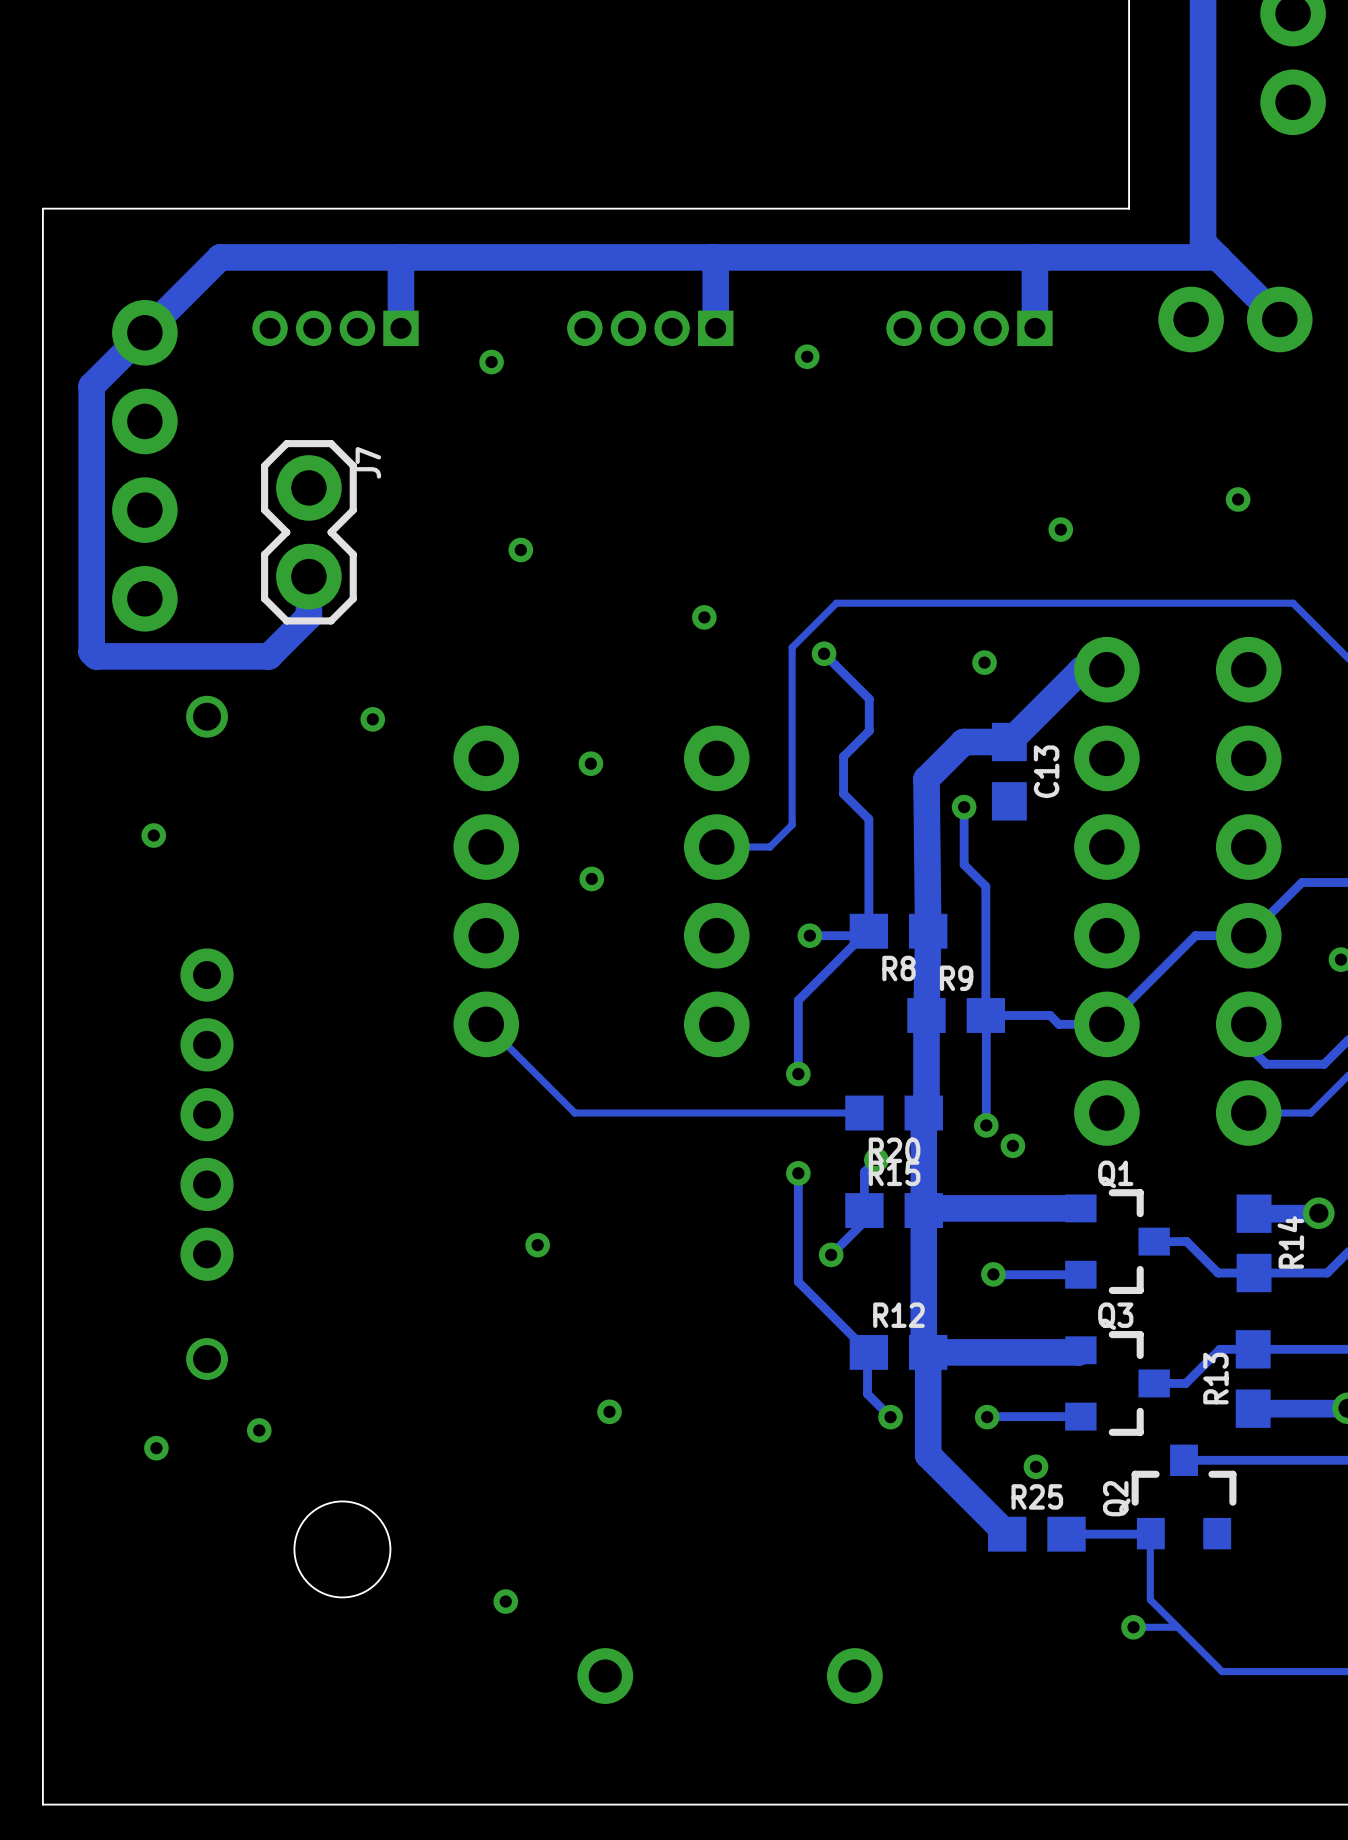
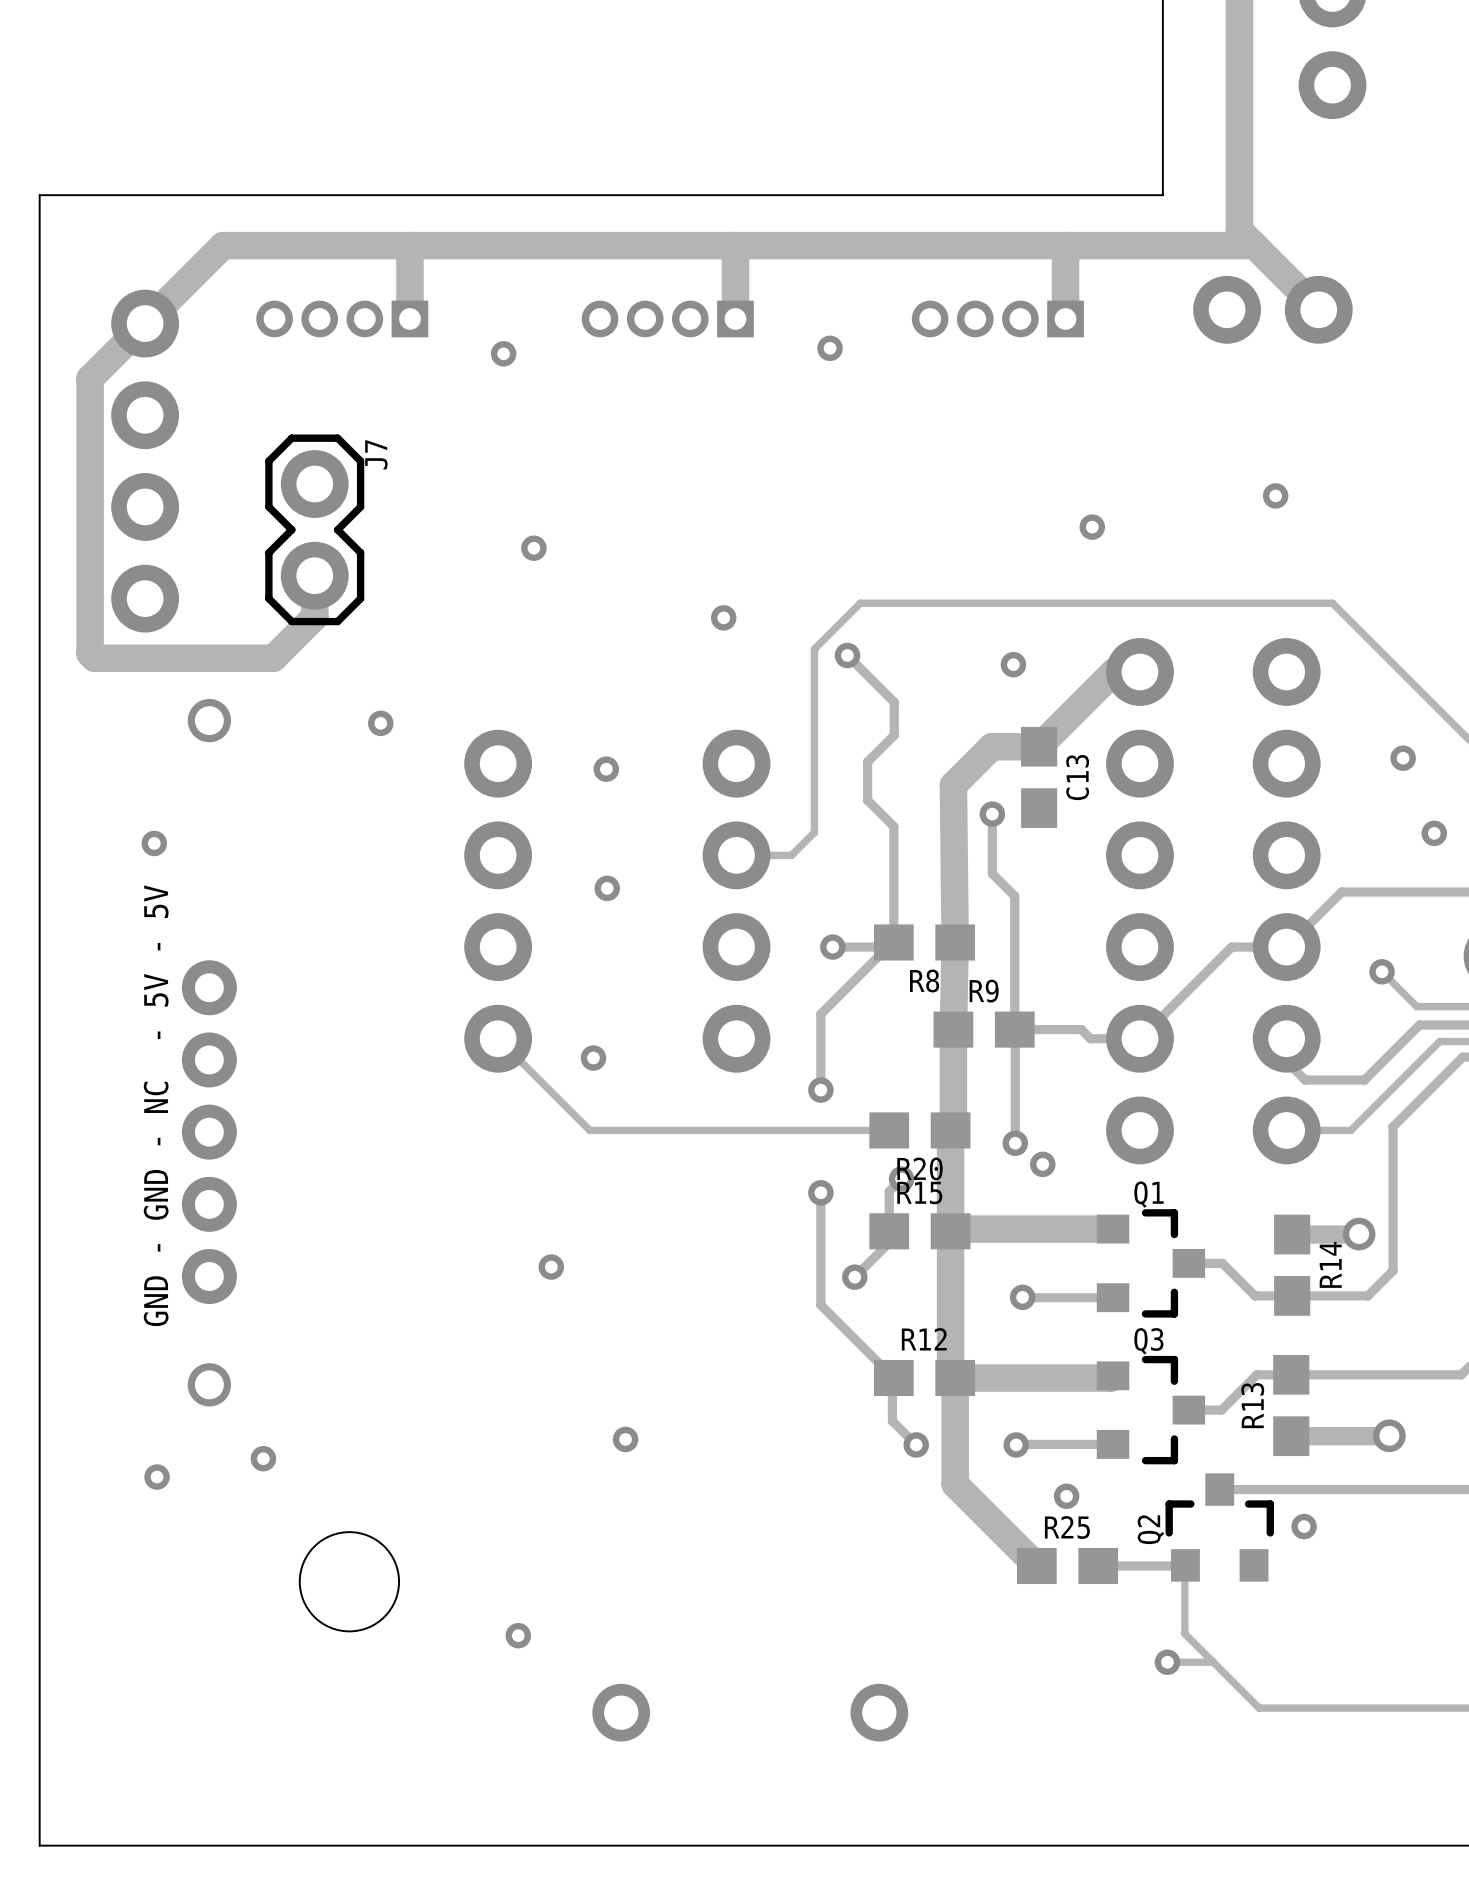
via: none -> (593, 1058)
text: none -> GND - GND - NC - 5V - 5V (156, 1105)
via: none -> (1304, 1526)

